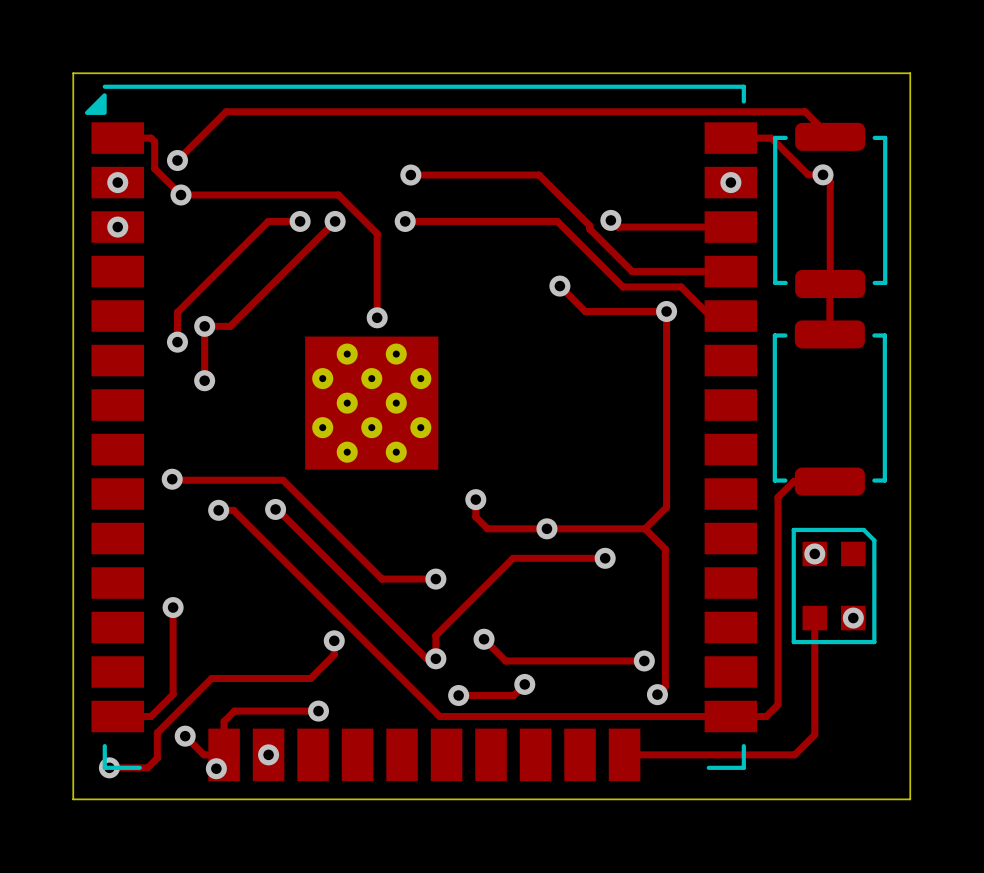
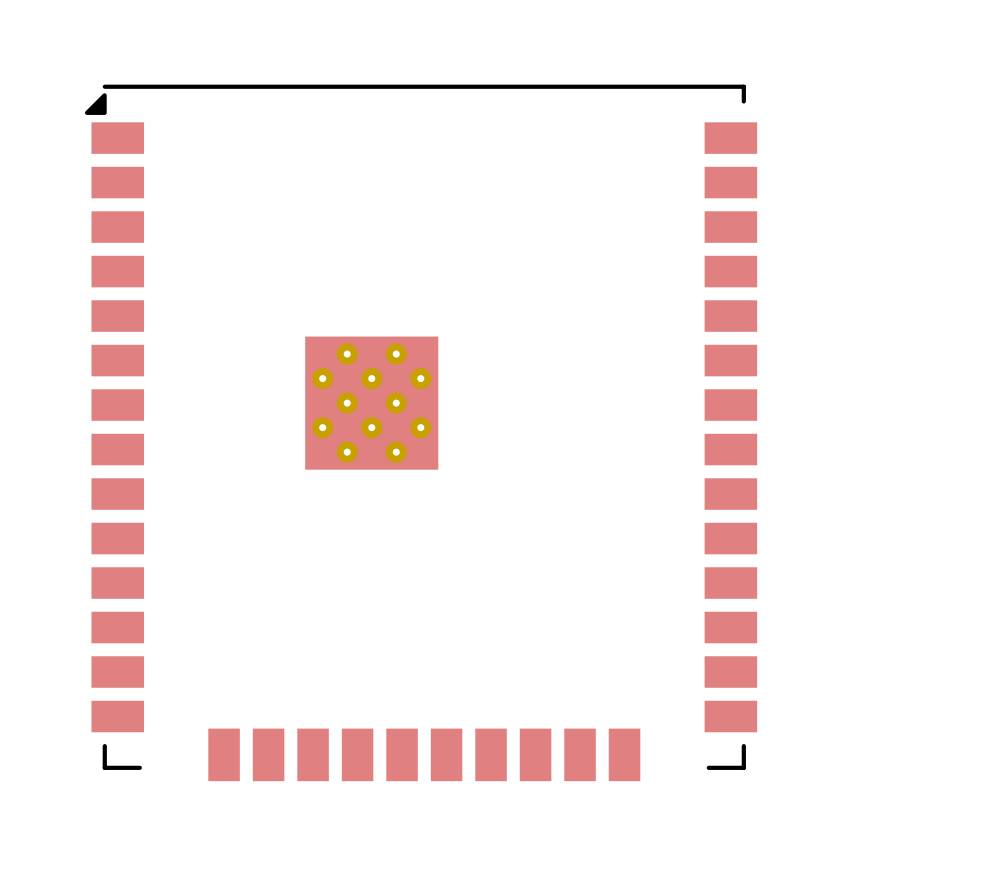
board edge: (73, 73) (910, 73) (910, 799) (73, 799) (73, 73) -> none
track: (830, 136) (805, 111) (226, 111) (177, 160) -> none
track: (117, 138) (151, 138) (154, 141) (154, 168) (180, 195) (338, 195) (377, 233) (377, 317) -> none
track: (730, 138) (771, 138) (808, 174) (823, 174) (830, 182) (830, 283) -> none
via: (177, 160) -> none
via: (823, 174) -> none
track: (410, 175) (539, 175) (632, 271) (730, 271) -> none
via: (410, 175) -> none
via: (117, 182) -> none
via: (730, 182) -> none
via: (180, 195) -> none
part: (830, 210) -> none
track: (610, 220) (617, 227) (730, 227) -> none
via: (610, 220) -> none
track: (300, 221) (268, 221) (177, 312) (177, 342) -> none
via: (300, 221) -> none
track: (335, 221) (230, 326) (204, 326) (204, 380) -> none
via: (335, 221) -> none
track: (405, 221) (557, 221) (622, 286) (681, 286) (710, 316) (730, 316) -> none
via: (405, 221) -> none
via: (117, 227) -> none
track: (829, 284) (829, 334) -> none
track: (559, 286) (585, 311) (666, 311) (666, 507) (645, 528) -> none
via: (559, 286) -> none
via: (666, 311) -> none
via: (377, 317) -> none
via: (204, 326) -> none
via: (177, 342) -> none
via: (204, 380) -> none
part: (829, 408) -> none
track: (172, 479) (283, 480) (382, 579) (435, 579) -> none
via: (172, 479) -> none
track: (829, 481) (793, 481) (777, 497) (777, 704) (766, 716) (439, 716) (233, 510) (218, 510) -> none
track: (475, 499) (475, 516) (487, 528) (645, 528) -> none
via: (475, 499) -> none
track: (275, 509) (426, 658) (435, 658) (435, 635) (513, 558) (605, 558) -> none
via: (275, 509) -> none
via: (218, 510) -> none
via: (546, 528) -> none
track: (645, 528) (665, 549) (665, 686) (657, 694) -> none
via: (814, 553) -> none
via: (605, 558) -> none
via: (435, 579) -> none
part: (834, 586) -> none
track: (173, 607) (173, 694) (151, 716) (117, 716) -> none
via: (173, 607) -> none
track: (814, 618) (814, 734) (794, 754) (624, 754) -> none
via: (853, 618) -> none
track: (484, 639) (505, 660) (644, 660) -> none
via: (484, 639) -> none
track: (334, 640) (334, 654) (310, 678) (211, 678) (157, 732) (157, 758) (147, 767) (109, 767) -> none
via: (334, 640) -> none
via: (435, 658) -> none
via: (644, 660) -> none
track: (524, 684) (513, 695) (458, 695) -> none
via: (524, 684) -> none
via: (657, 694) -> none
via: (458, 695) -> none
track: (318, 711) (234, 711) (224, 721) (224, 754) (203, 754) (185, 736) -> none
via: (318, 711) -> none
via: (185, 736) -> none
via: (268, 754) -> none
via: (109, 767) -> none
via: (216, 768) -> none

